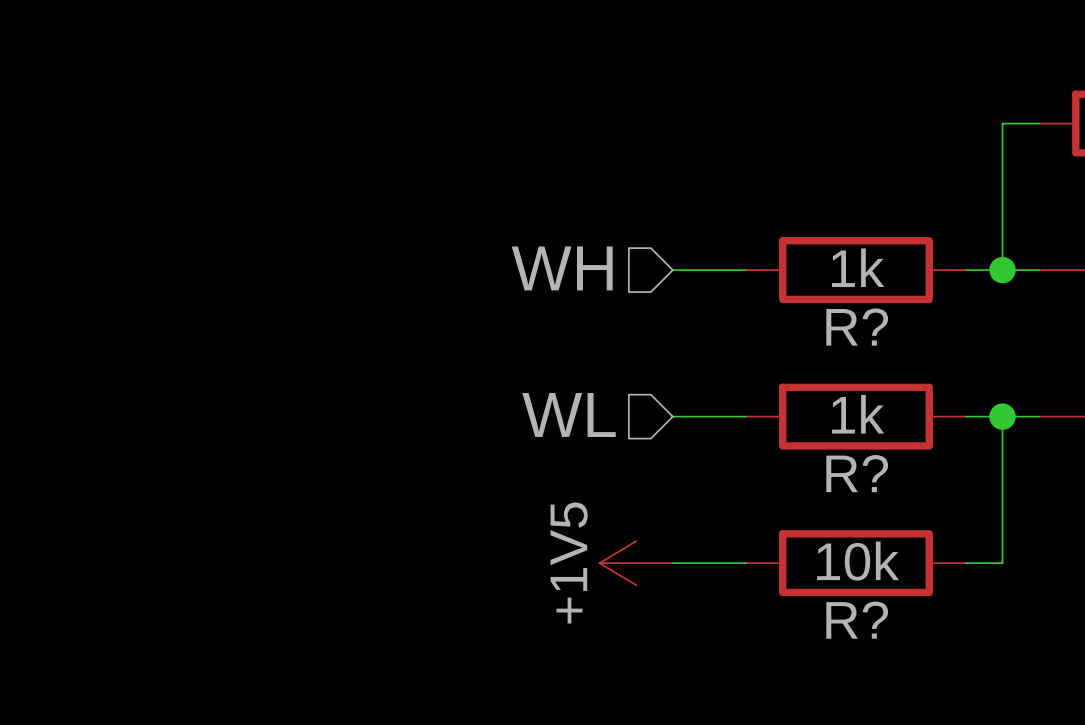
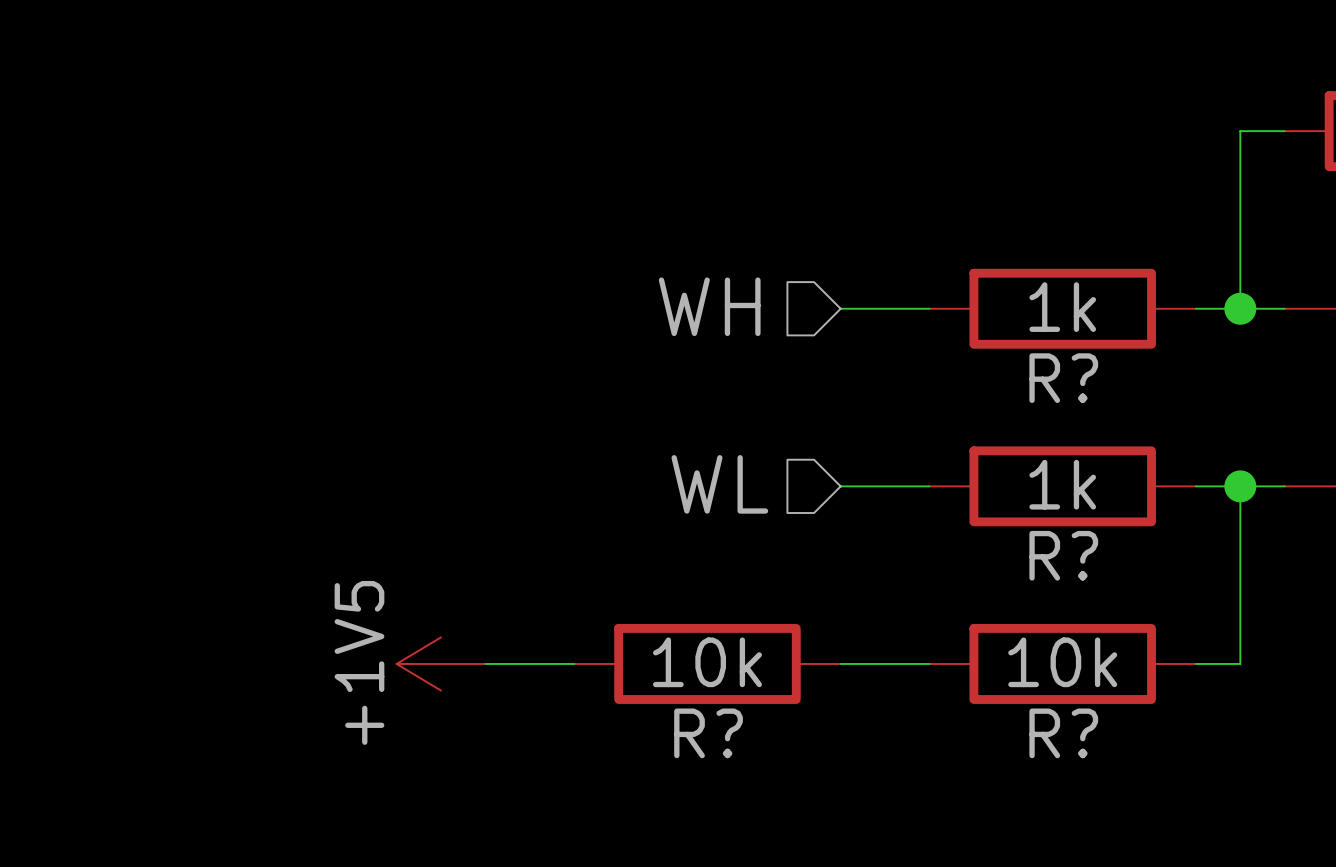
wire: none -> (485, 663) (574, 663)
R?: none -> 10k (707, 663)
power symbol position: +1V5 (636, 563) -> +1V5 (441, 663)

